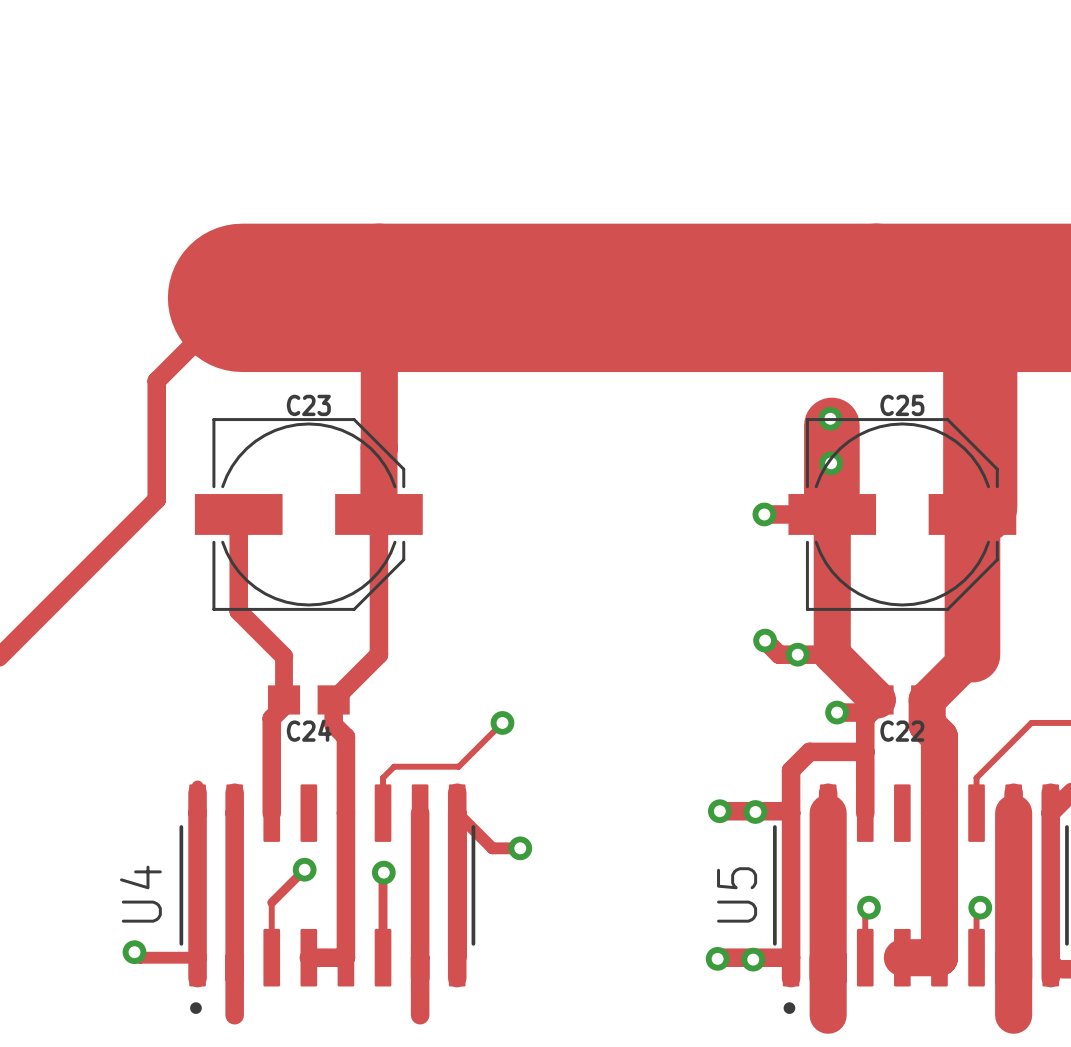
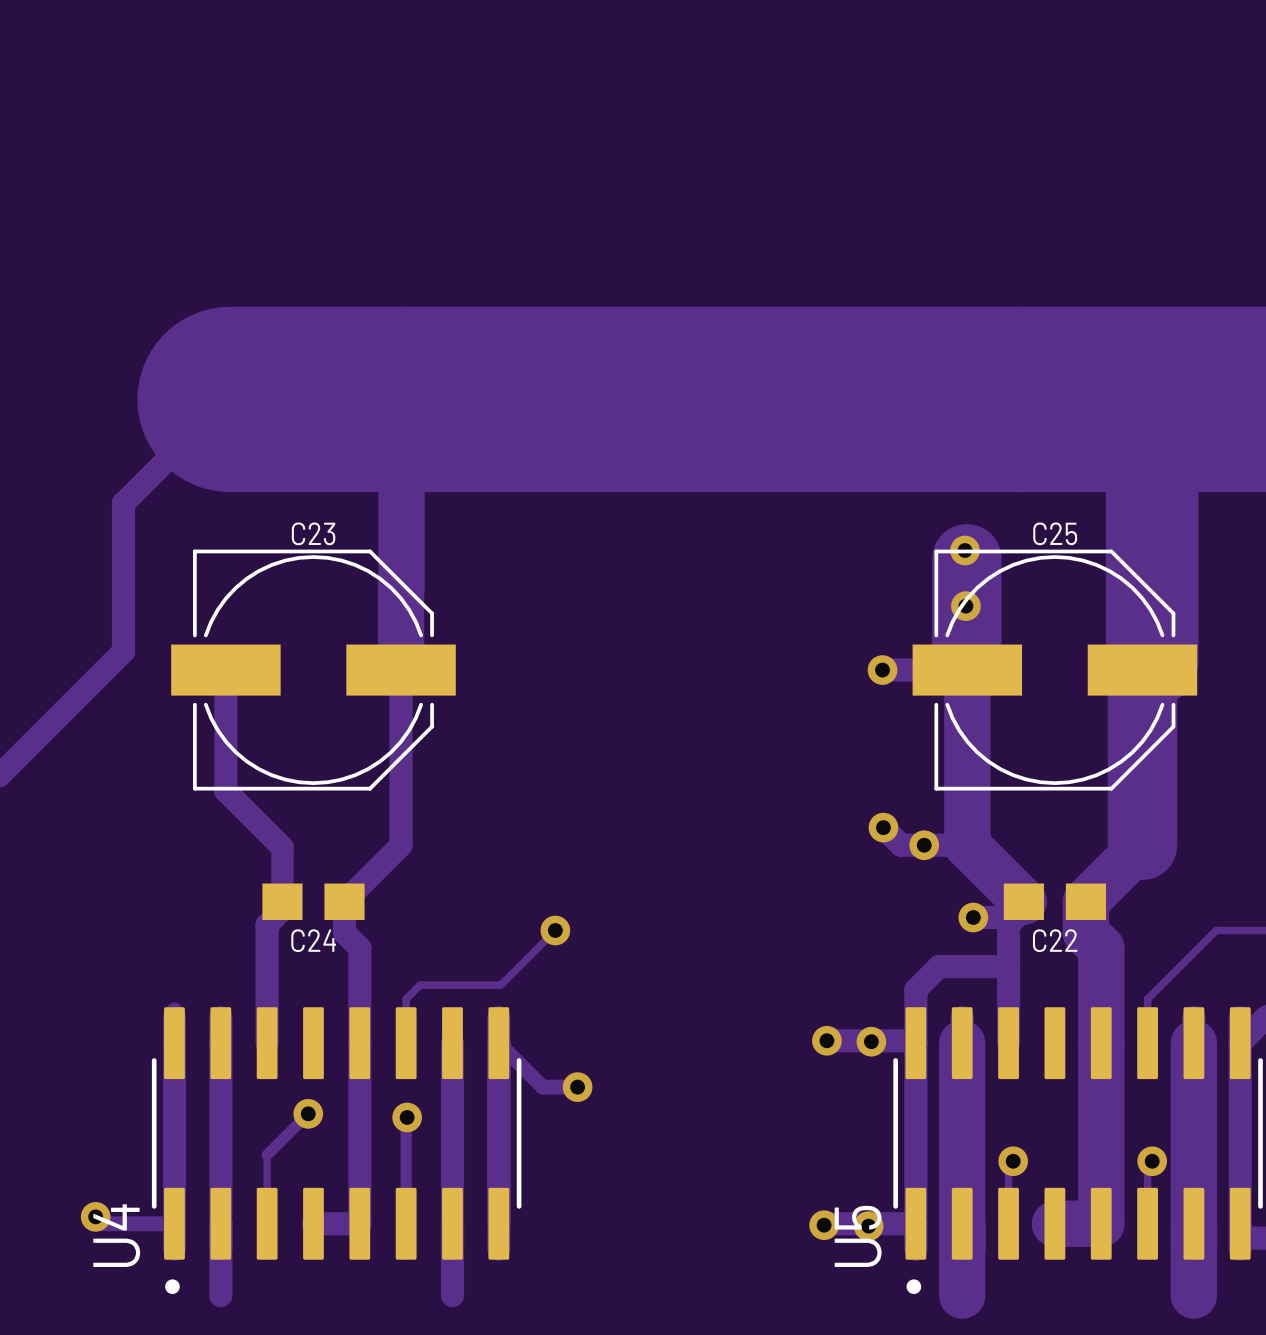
U4 name position: U4 (140, 894) -> U4 (116, 1235)
U5 name position: U5 (737, 894) -> U5 (858, 1236)

